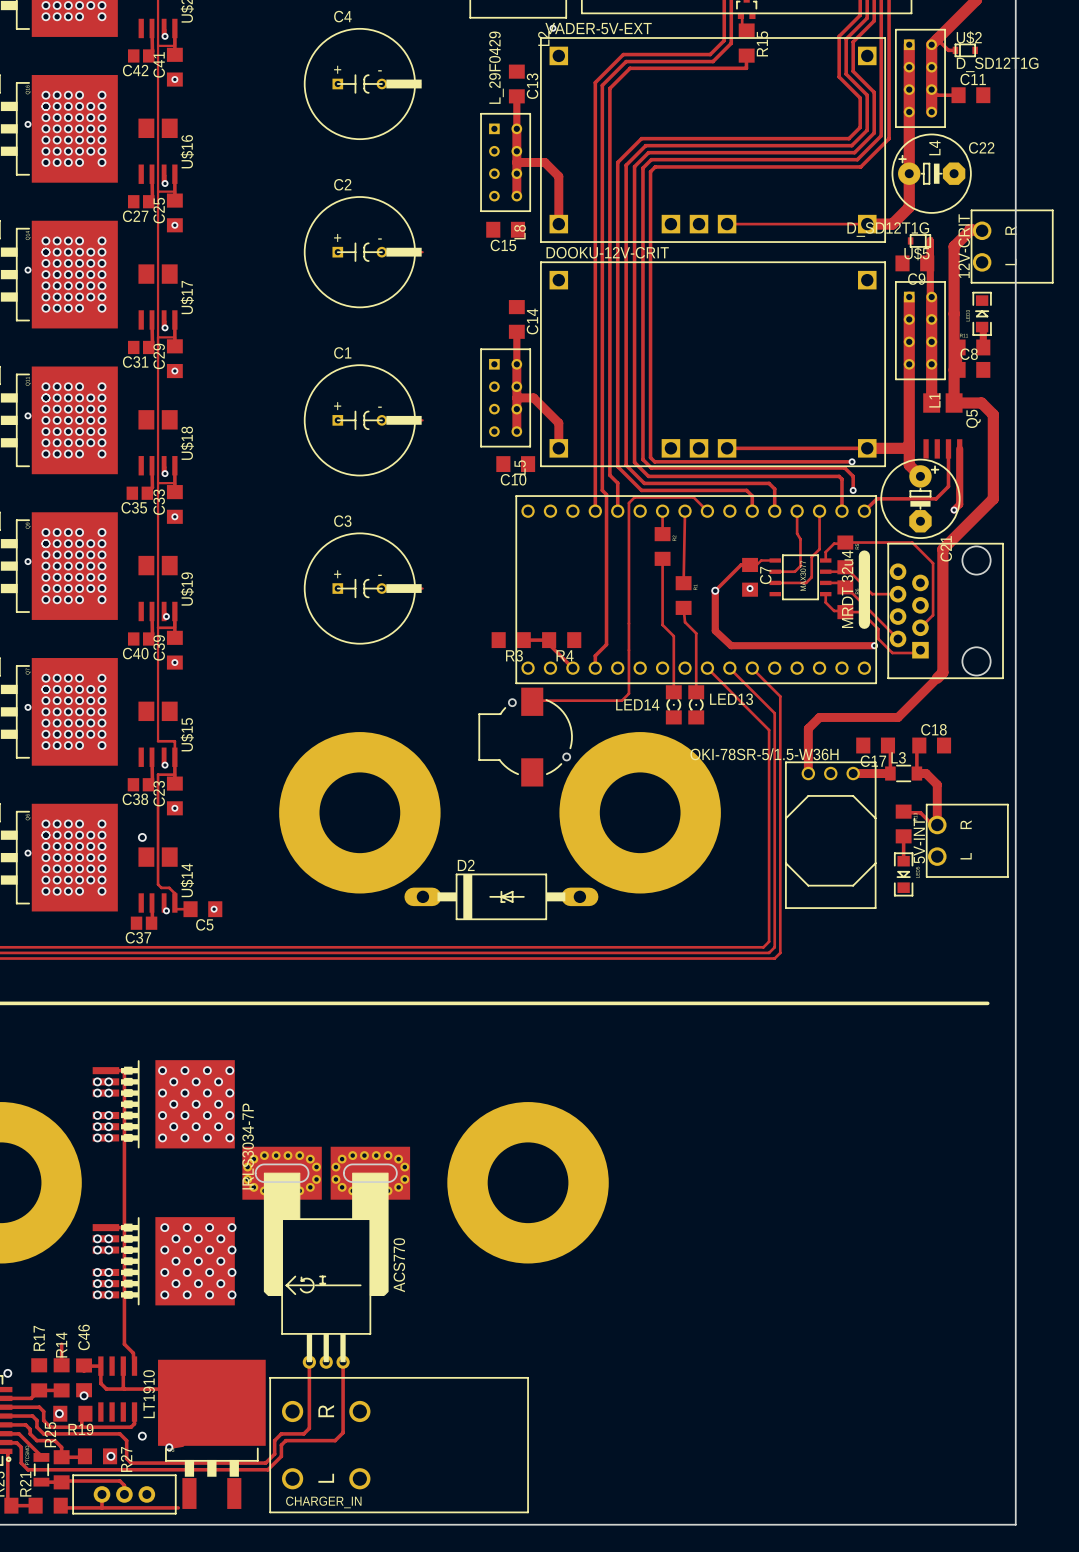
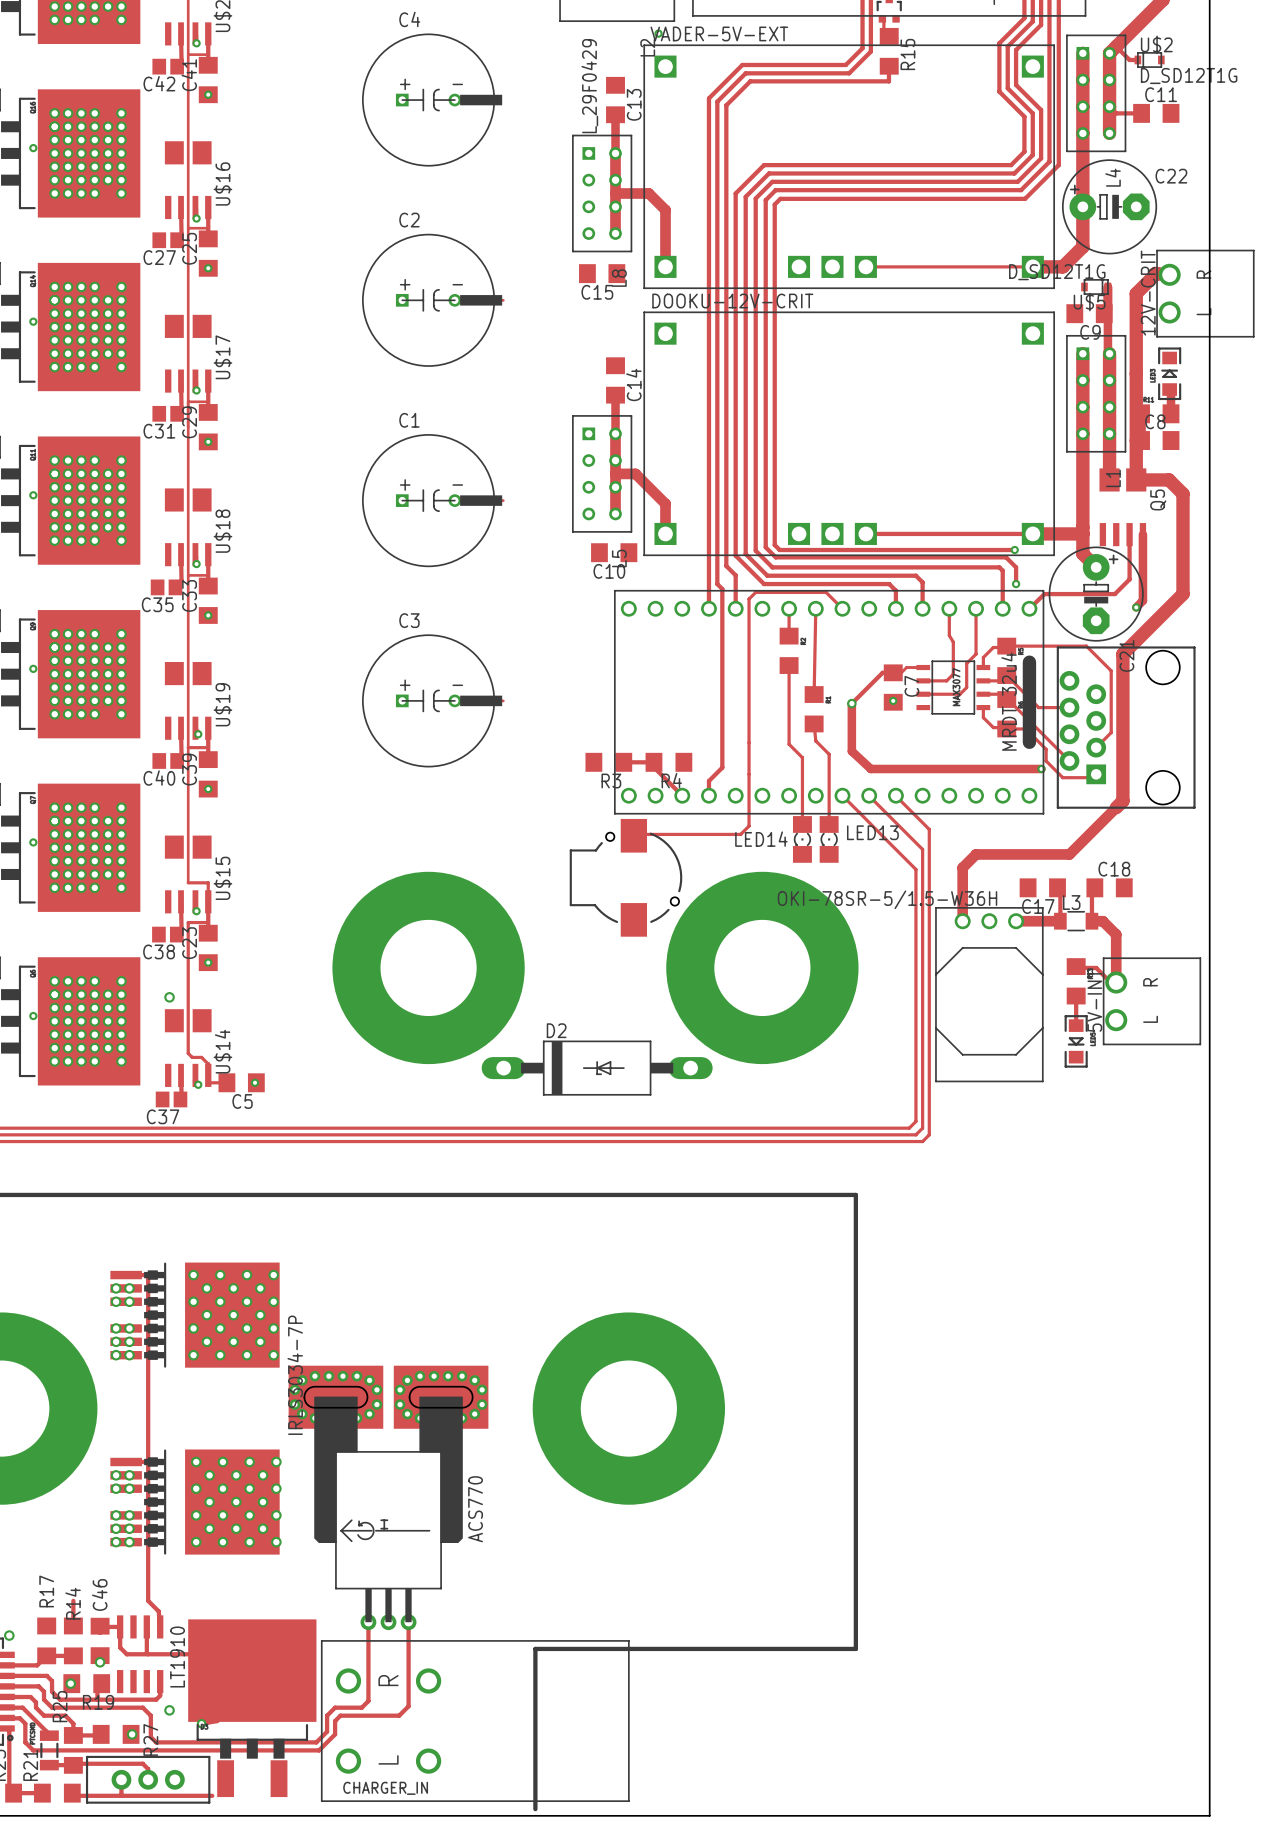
line: (718, 1003) (987, 1003) -> (855, 1194) (855, 1648) (535, 1648) (535, 1809)

